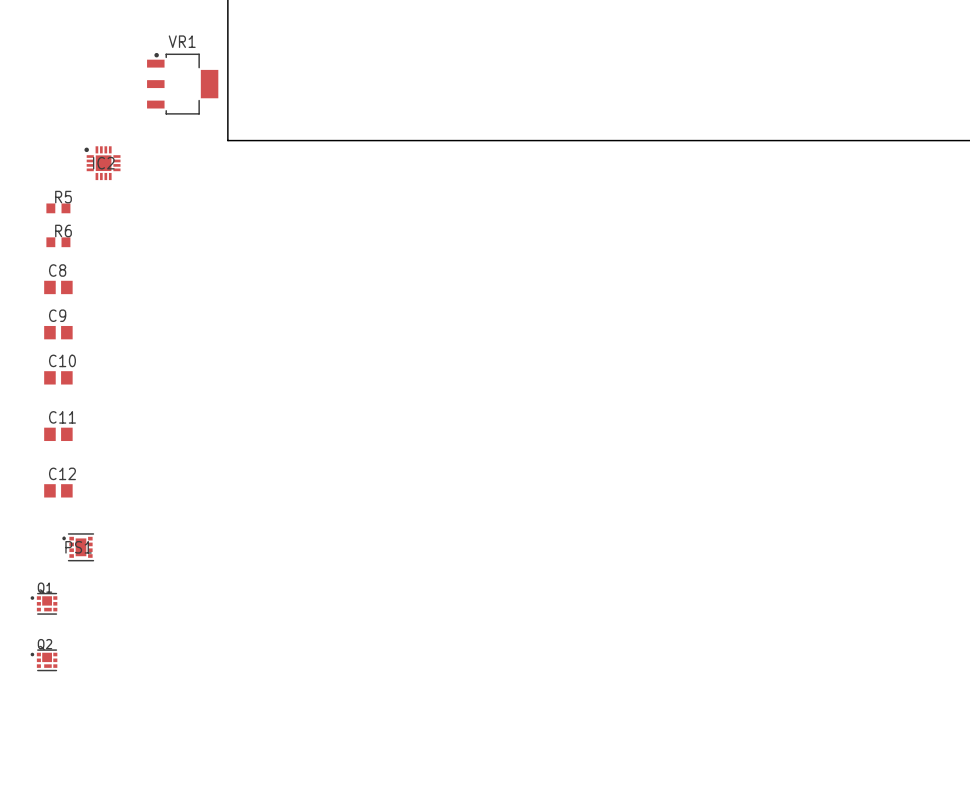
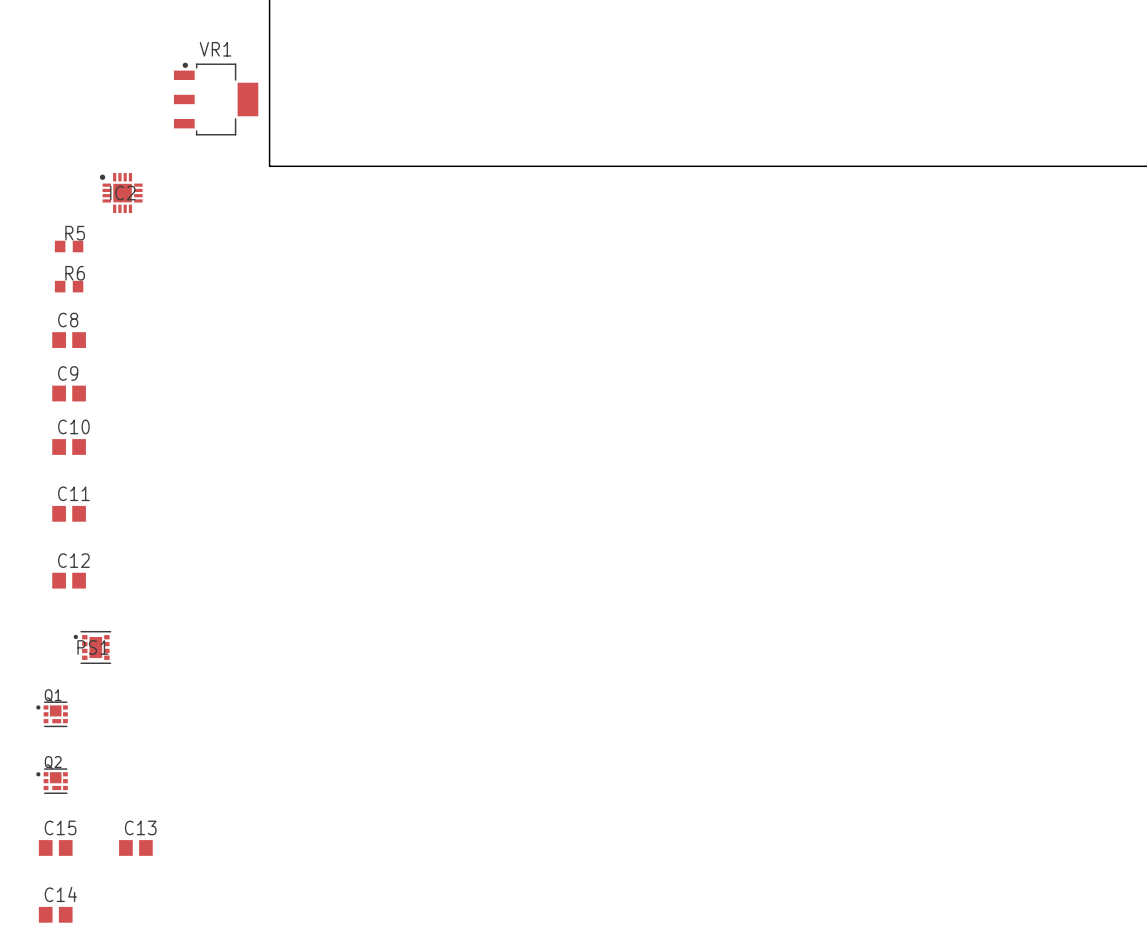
C15: none -> (55, 847)
C13: none -> (135, 847)
C14: none -> (55, 914)

